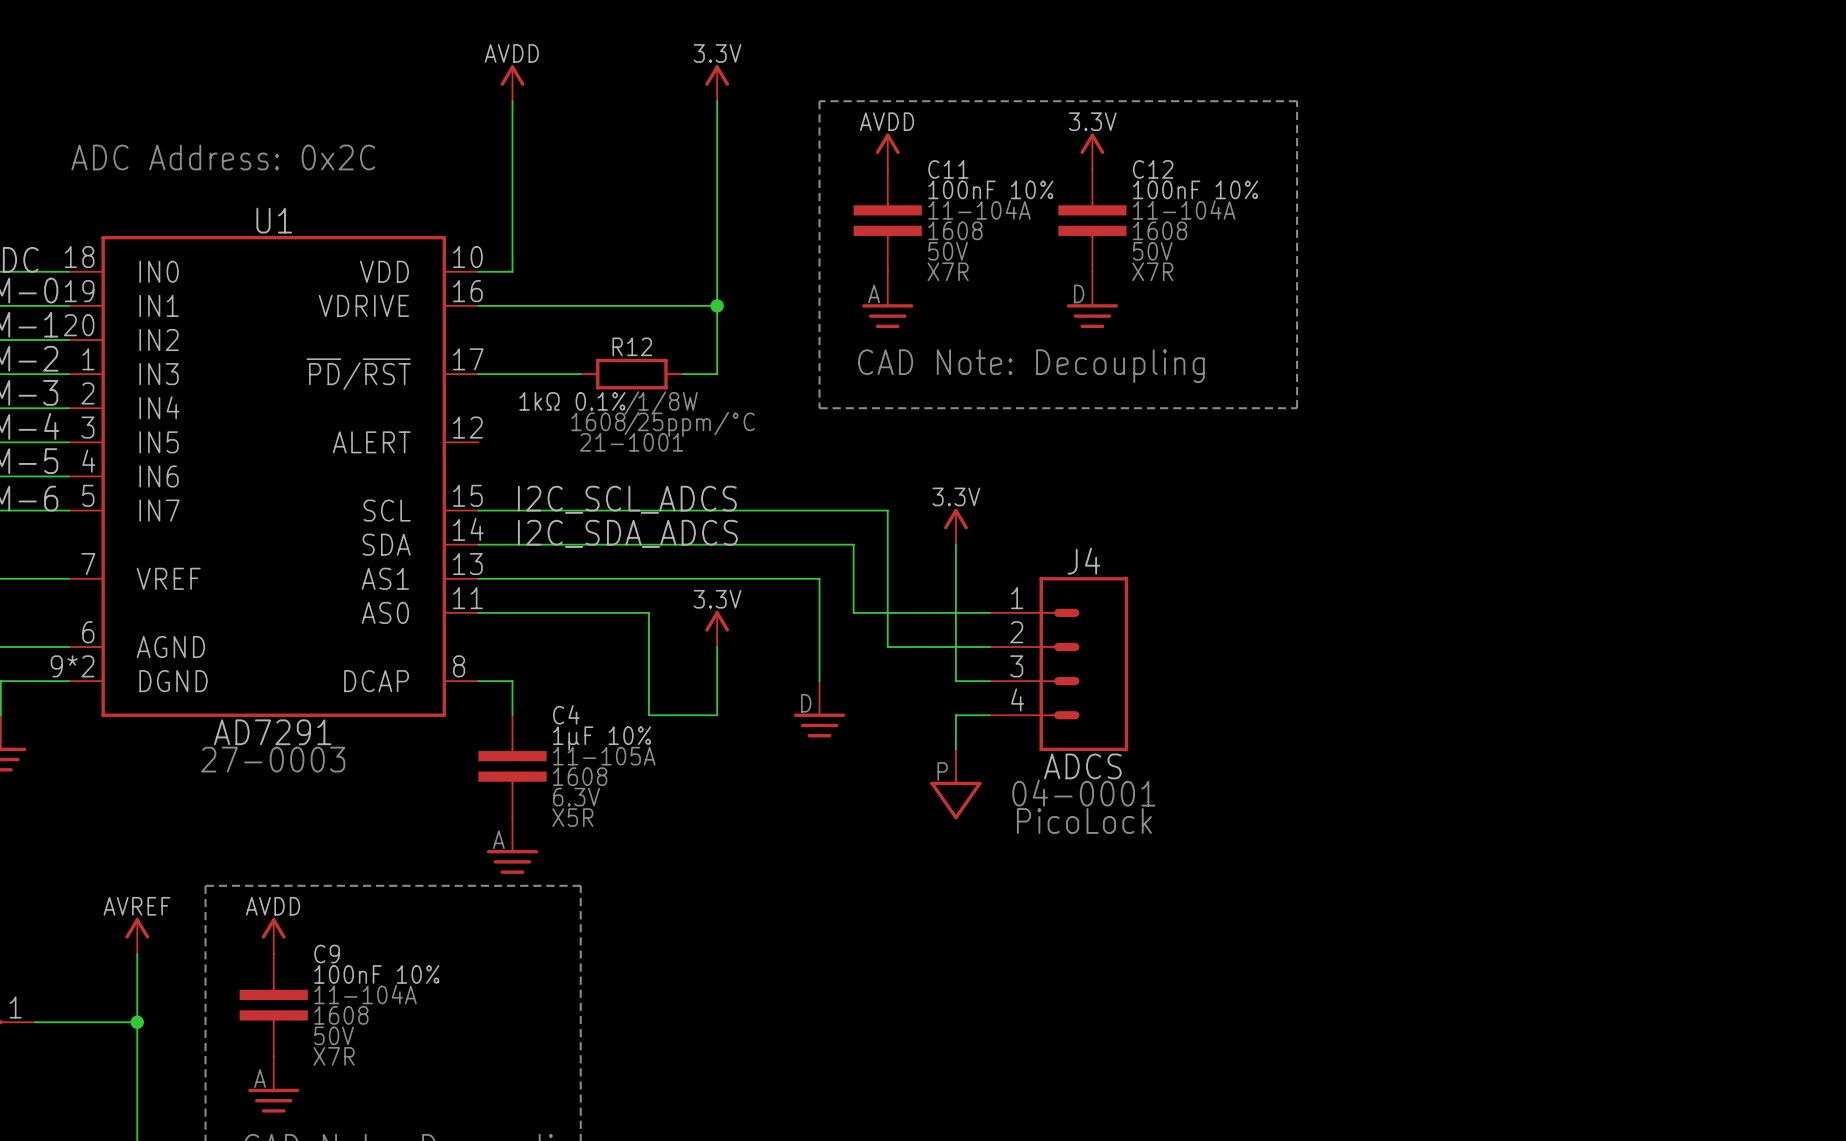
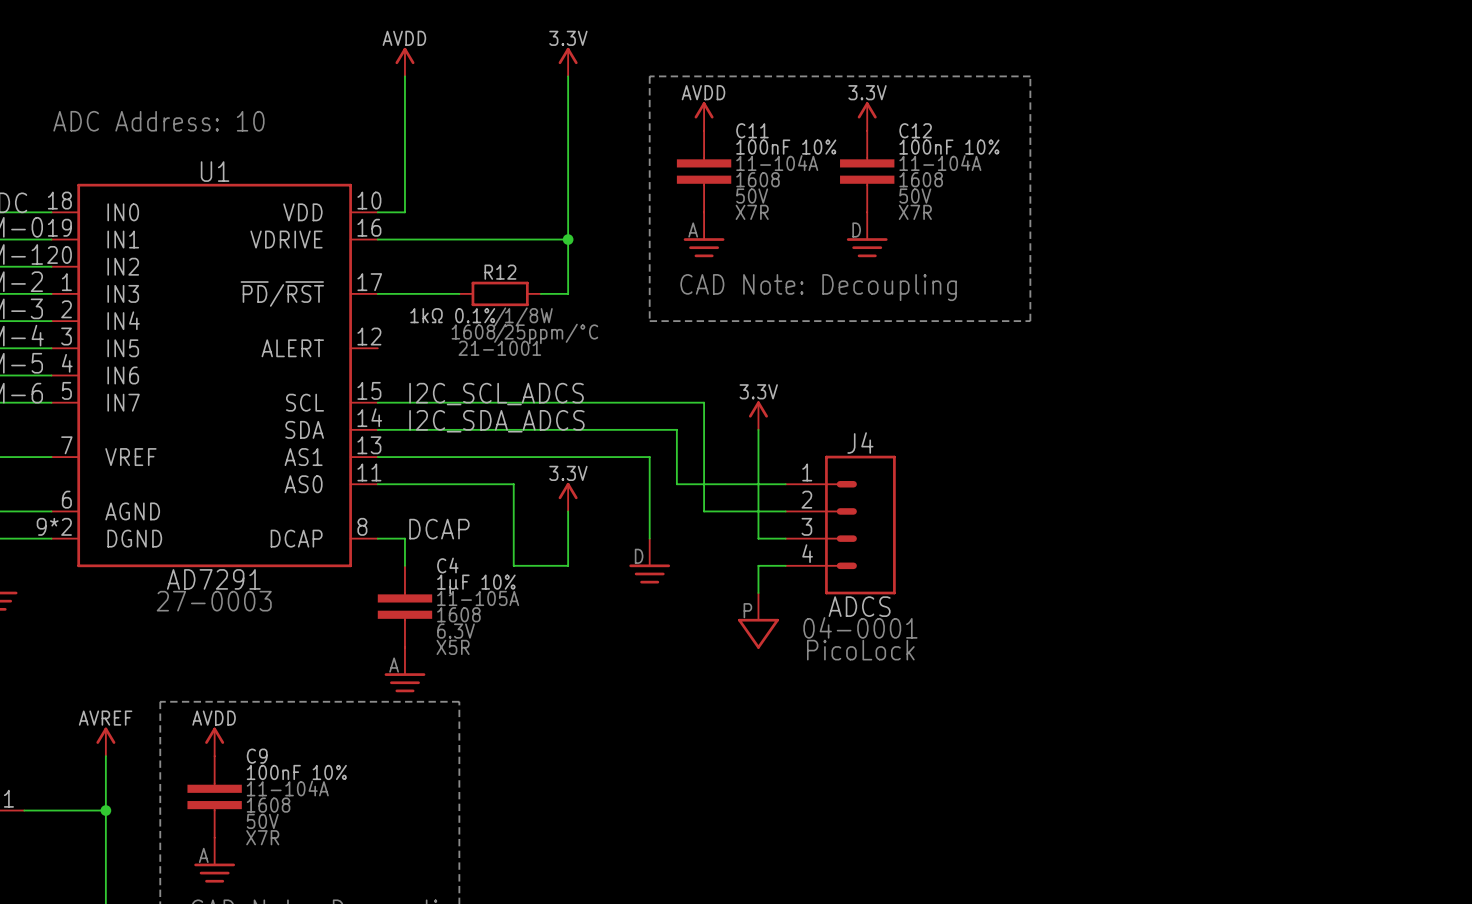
text: ADC Address: 0x2C (223, 157) -> ADC Address: 10 (158, 121)
label: none -> DCAP (439, 529)

